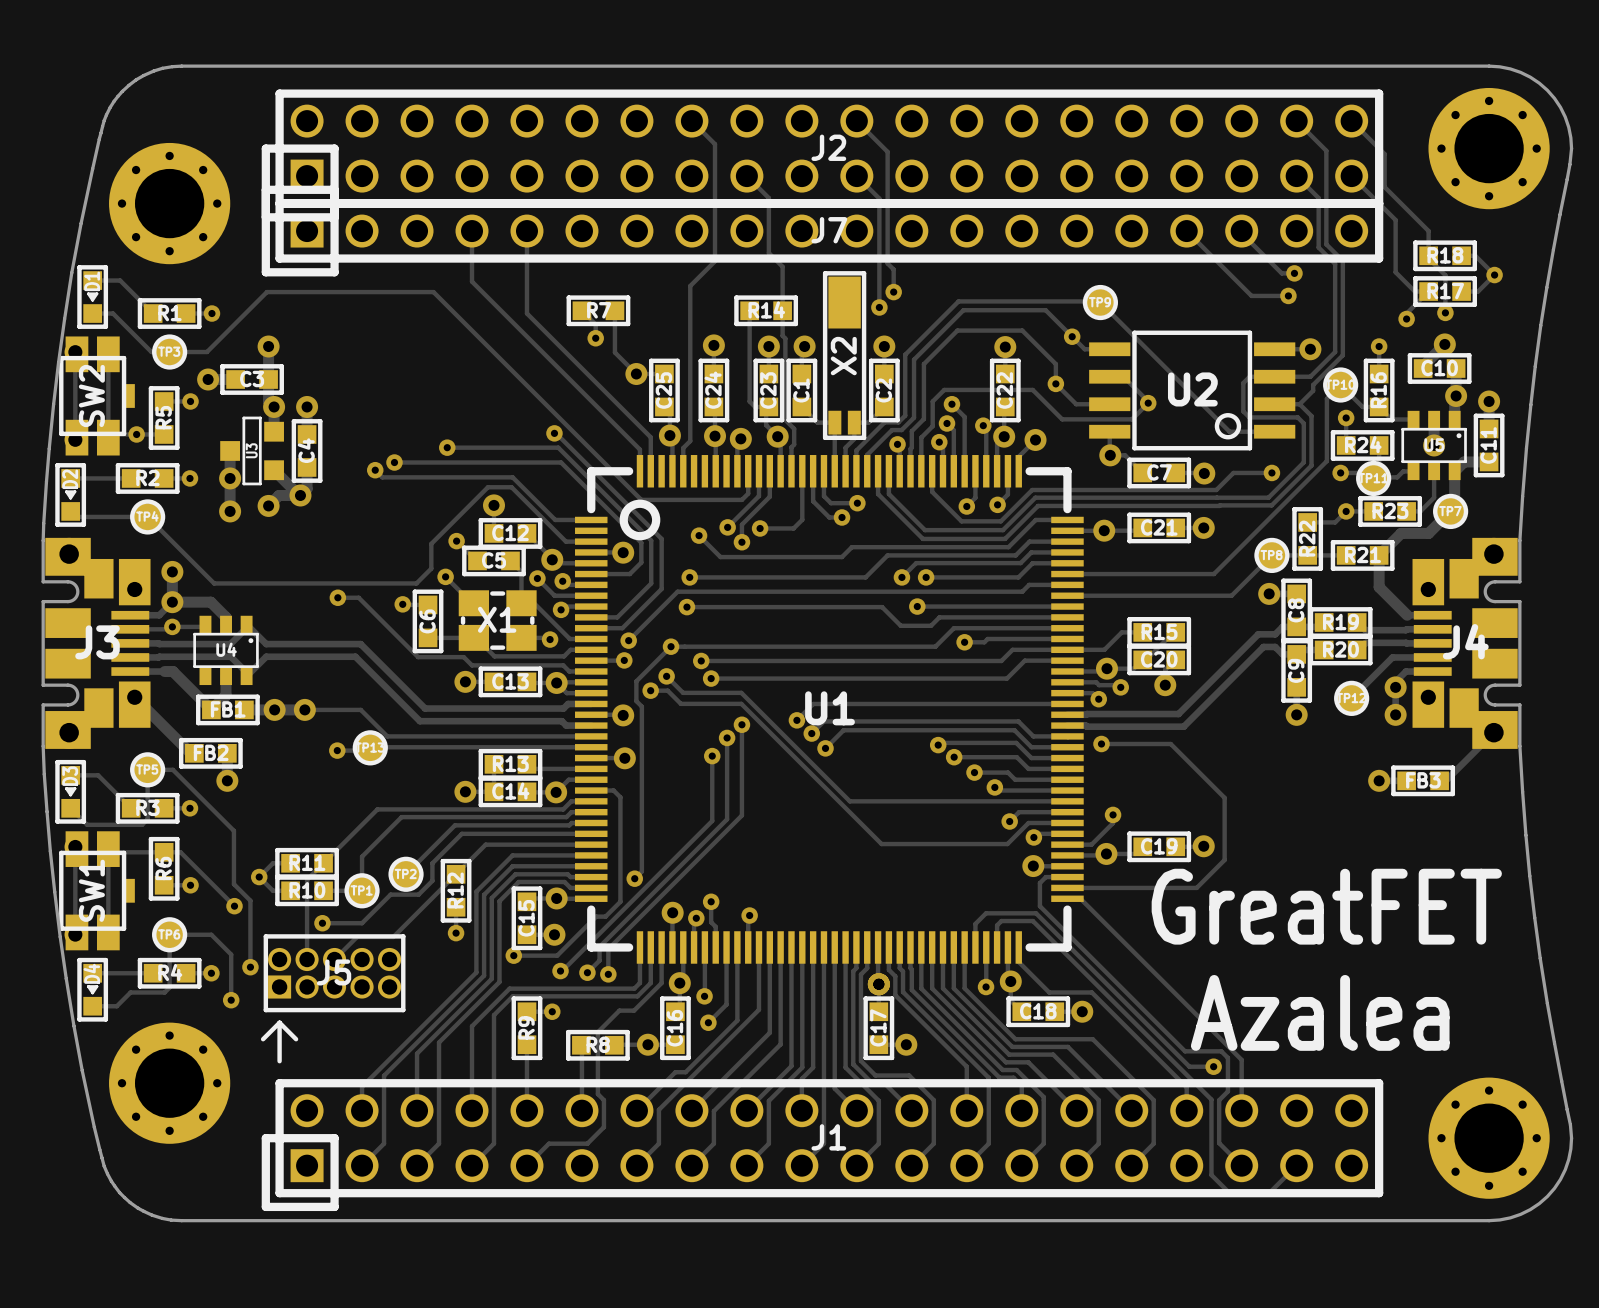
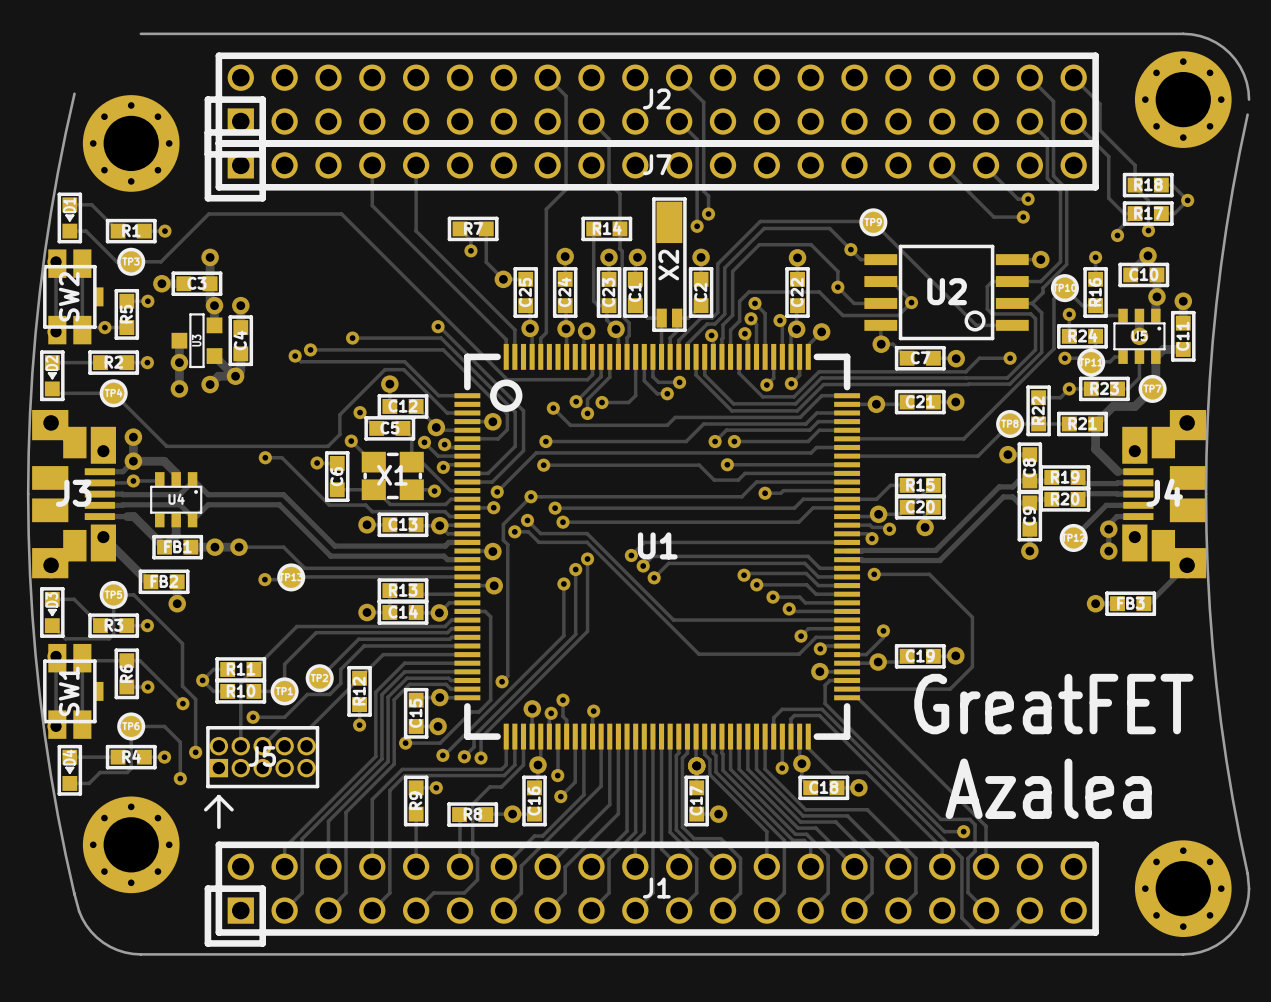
board edge: (181, 66) (162, 68) (136, 79) (117, 96) (104, 120) (81, 223) (64, 319) (49, 448) (43, 540) (43, 581) (70, 582) (74, 584) (77, 590) (76, 596) (70, 601) (43, 601) (43, 685) (70, 685) (75, 689) (77, 695) (75, 701) (70, 704) (43, 704) (43, 746) (54, 891) (66, 978) (82, 1070) (99, 1149) (104, 1166) (111, 1181) (119, 1192) (137, 1208) (162, 1218) (181, 1220) -> (74, 893) (82, 918) (96, 937) (117, 950) (140, 954)
board edge: none -> (74, 93) (50, 212) (39, 292) (30, 413) (28, 494) (30, 574) (39, 695) (50, 775) (74, 894)
board edge: (1571, 148) (1546, 287) (1535, 366) (1522, 496) (1519, 581) (1492, 582) (1487, 585) (1485, 591) (1487, 597) (1492, 601) (1519, 601) (1519, 685) (1492, 685) (1486, 690) (1485, 696) (1488, 702) (1492, 704) (1519, 704) (1522, 791) (1534, 917) (1547, 1003) (1571, 1138) -> (1247, 873) (1249, 888)
board edge: none -> (1247, 114) (1226, 227) (1216, 303) (1209, 379) (1206, 494) (1209, 608) (1216, 685) (1226, 760) (1247, 873)

